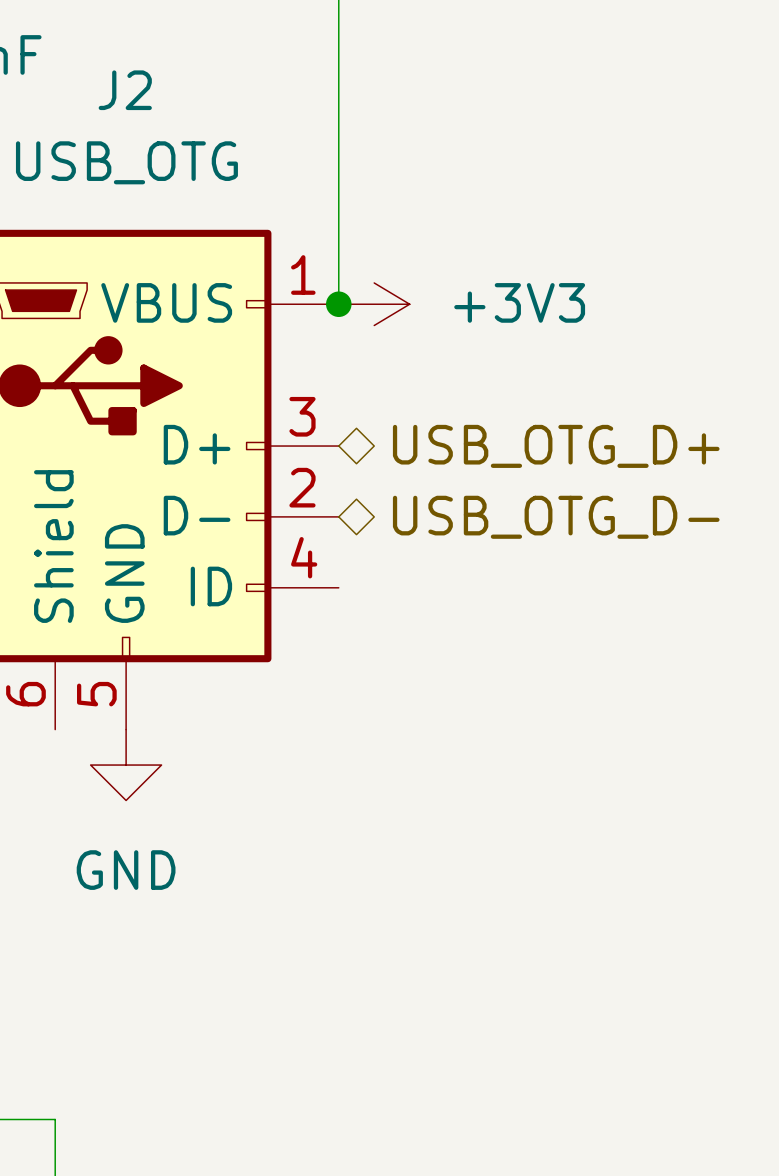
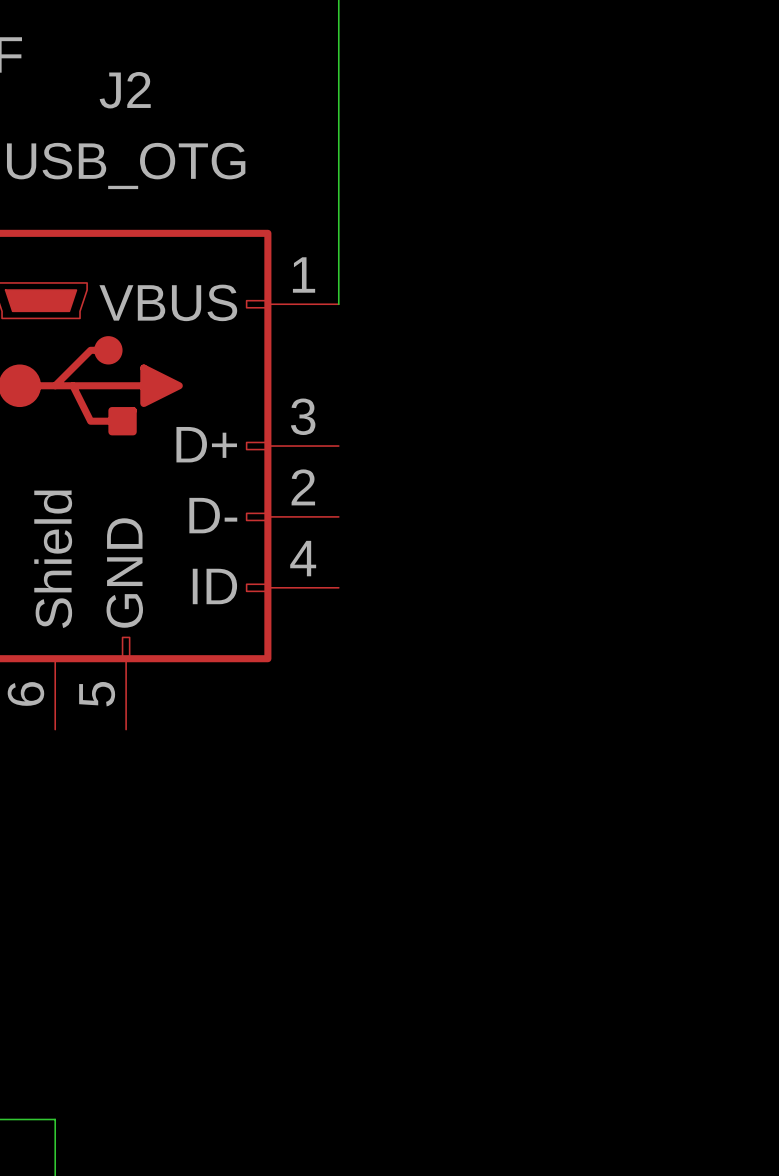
junction: (338, 304) -> none
power symbol: +3V3 (374, 304) -> none
hierarchical label: USB_OTG_D+ (556, 446) -> none
hierarchical label: USB_OTG_D- (556, 517) -> none
power symbol: GND (126, 765) -> none

